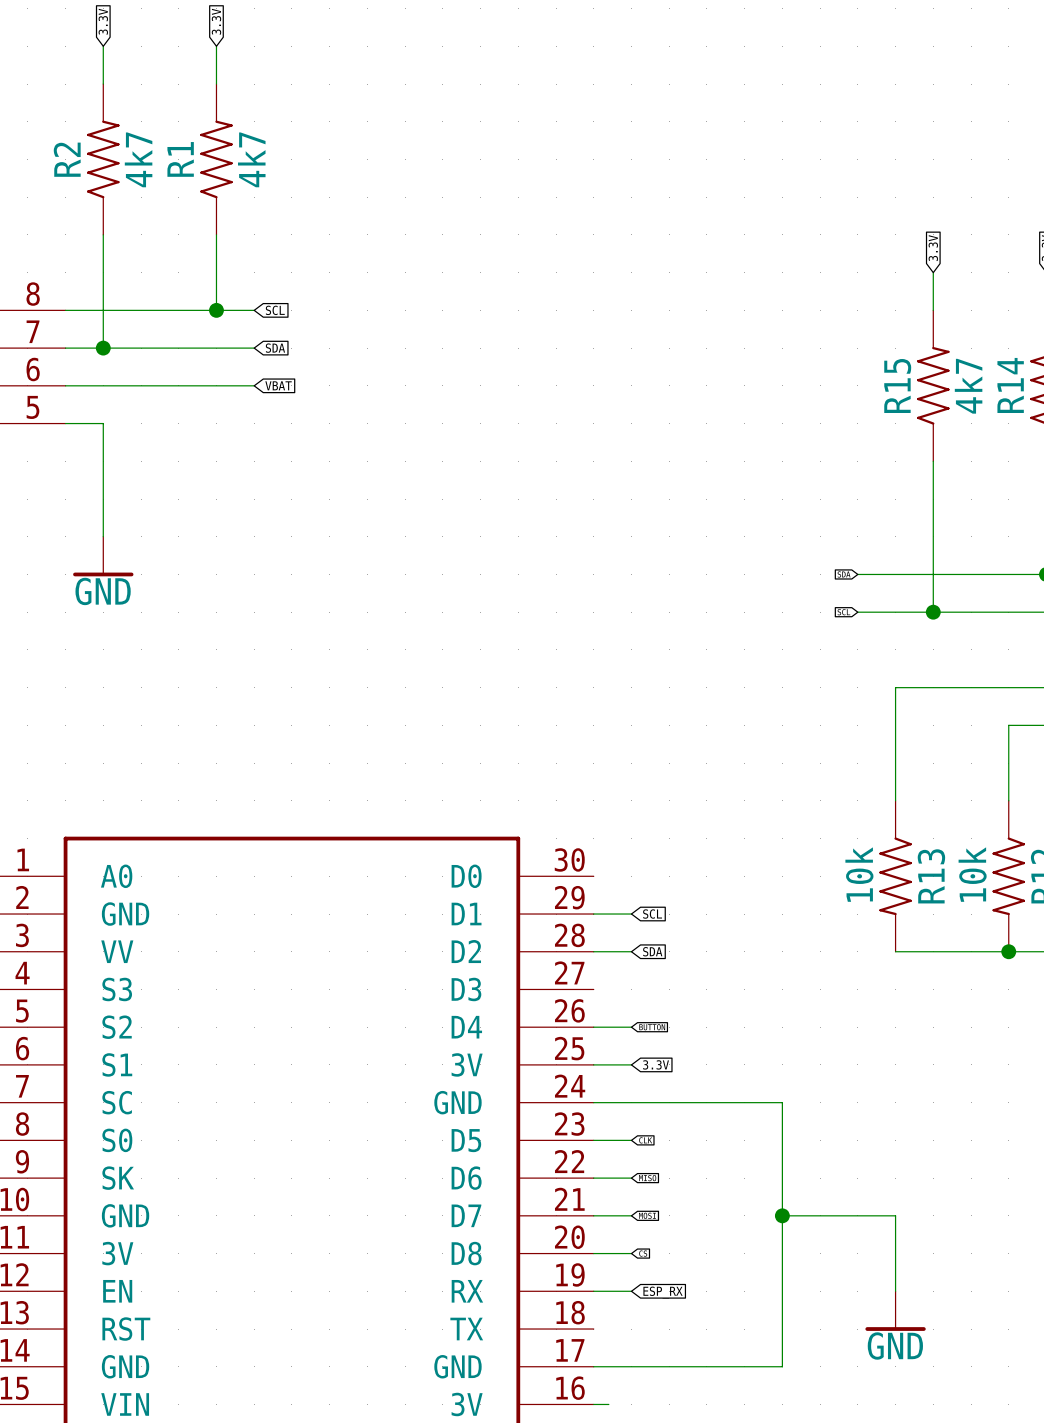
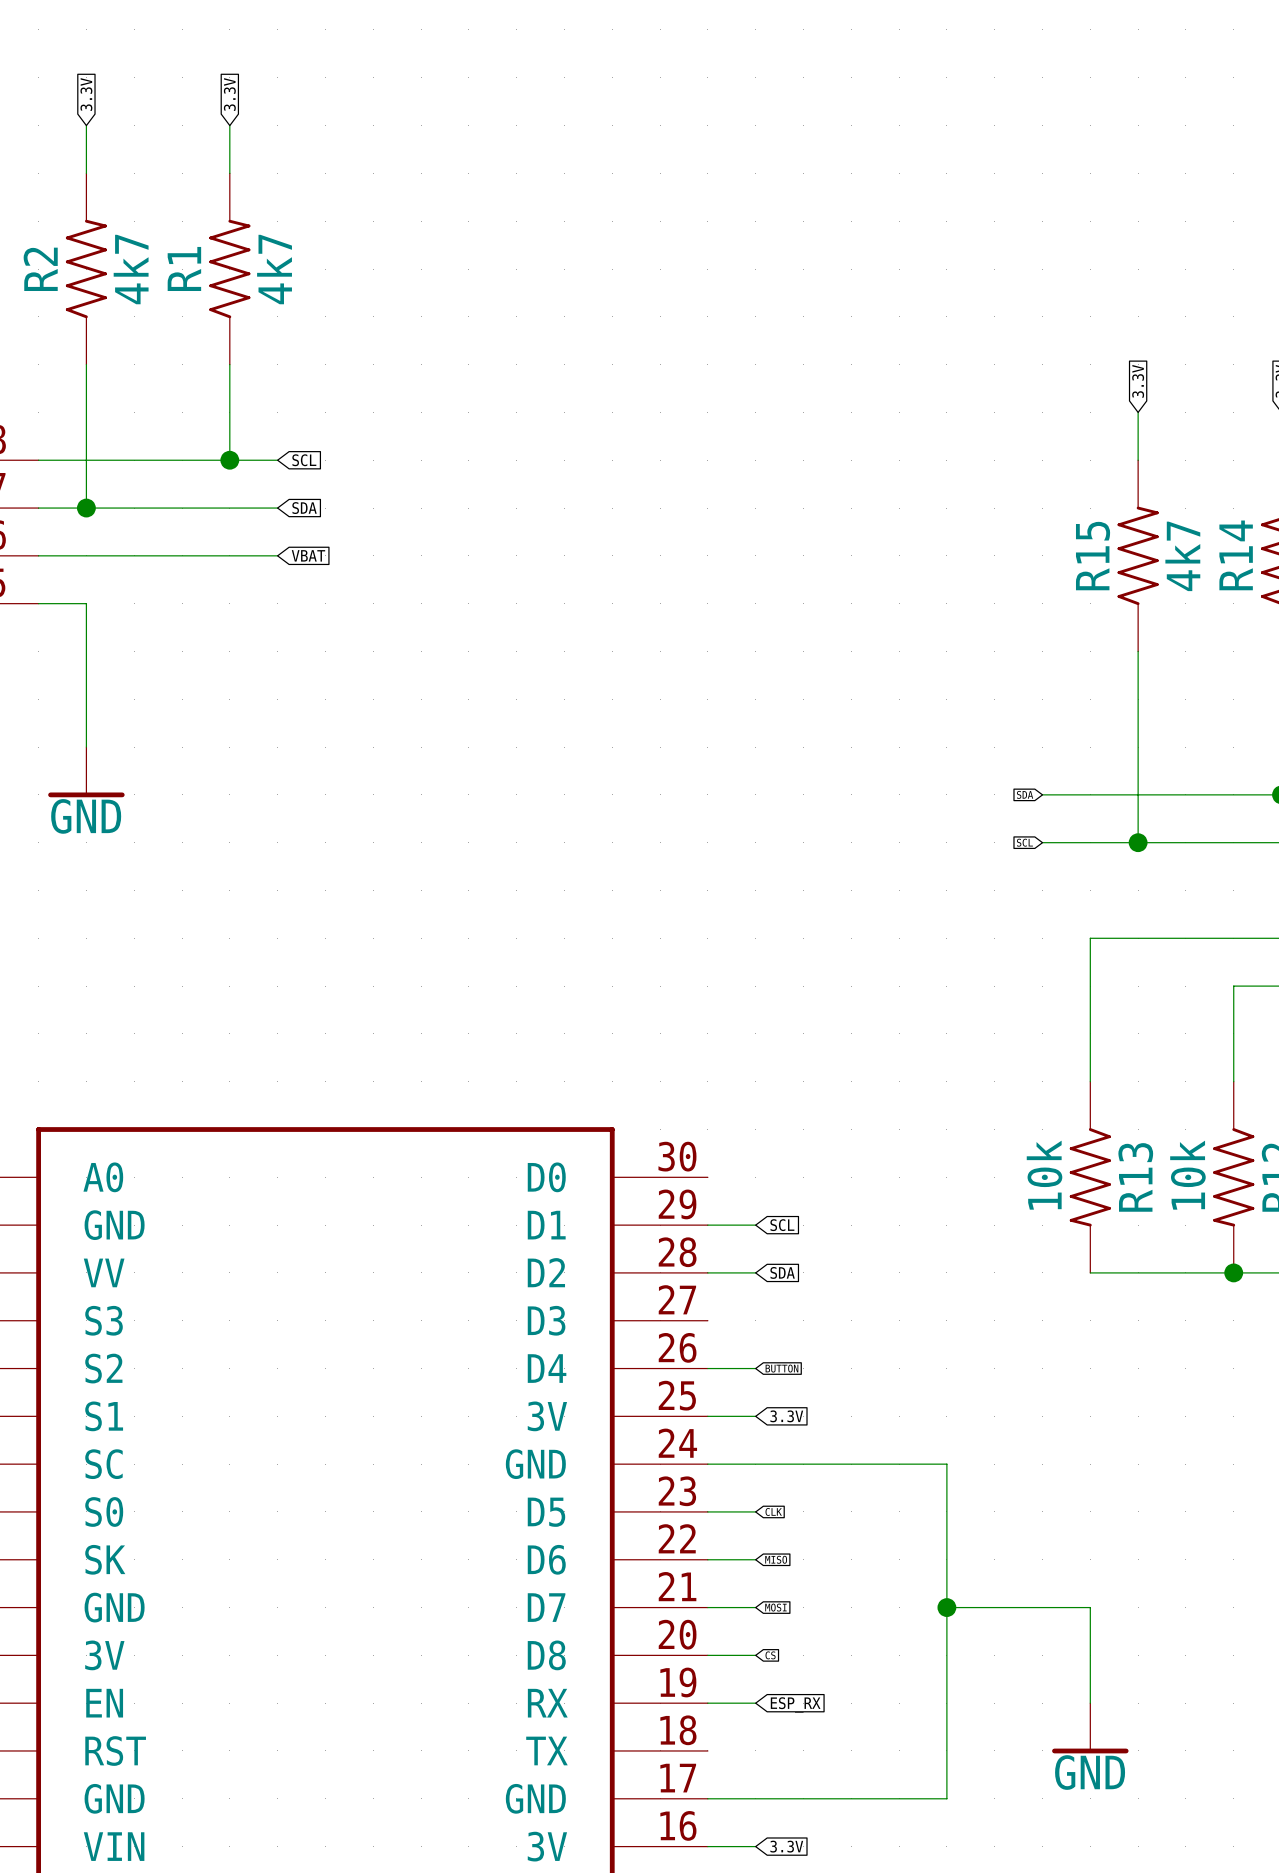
wire: none -> (727, 1846) (755, 1846)
global label: none -> 3.3V (786, 1846)

